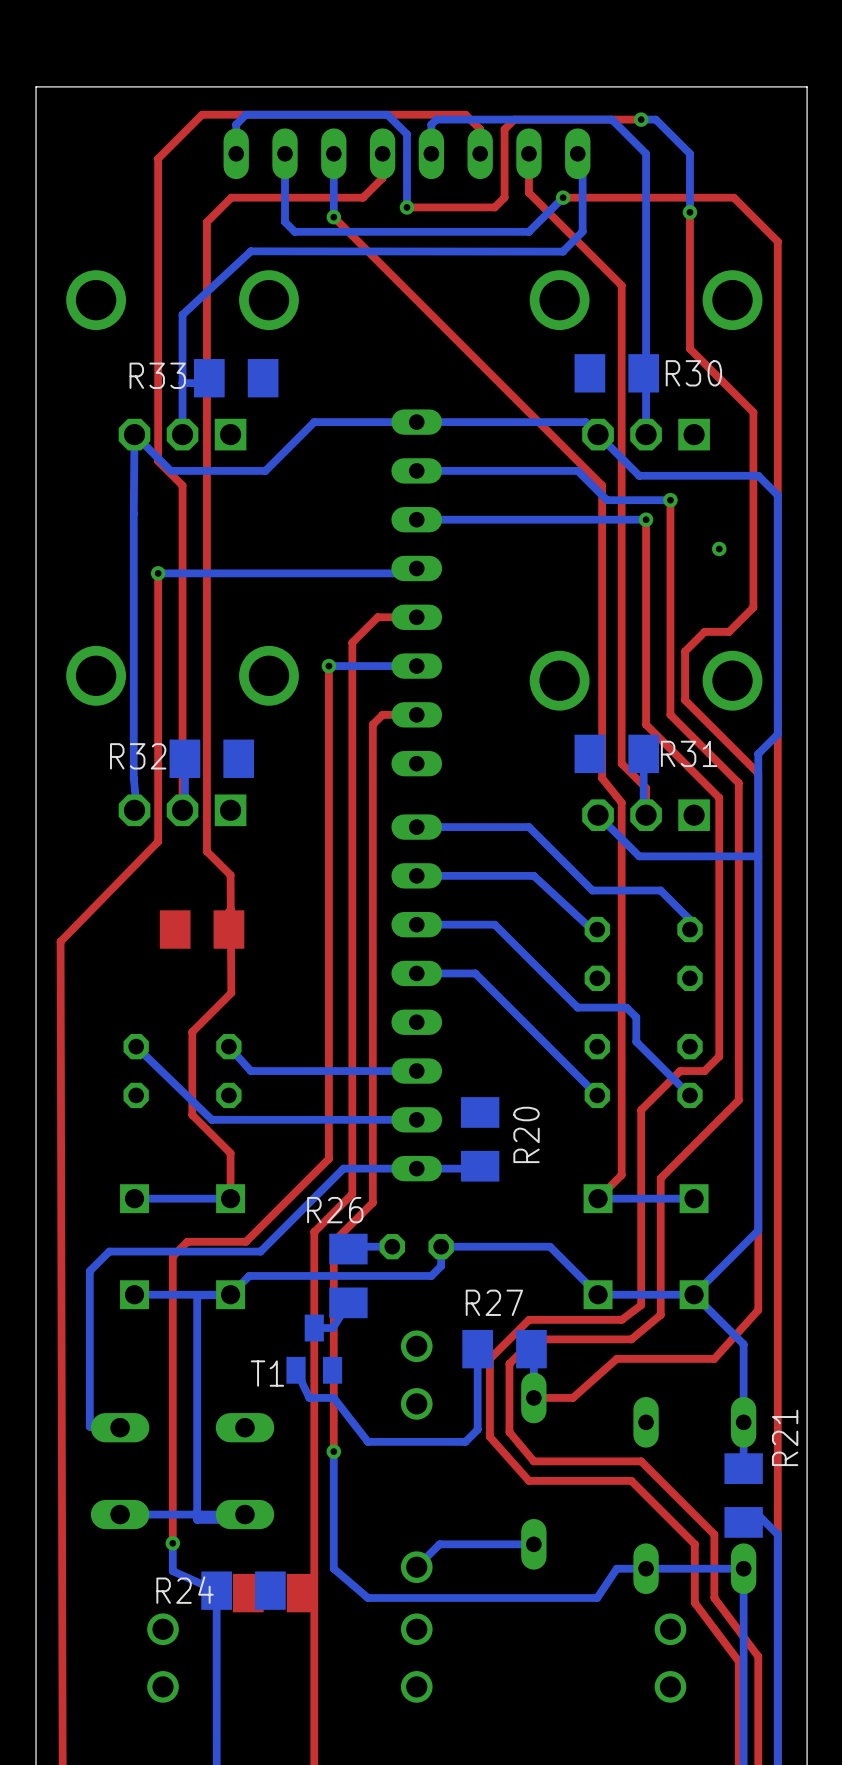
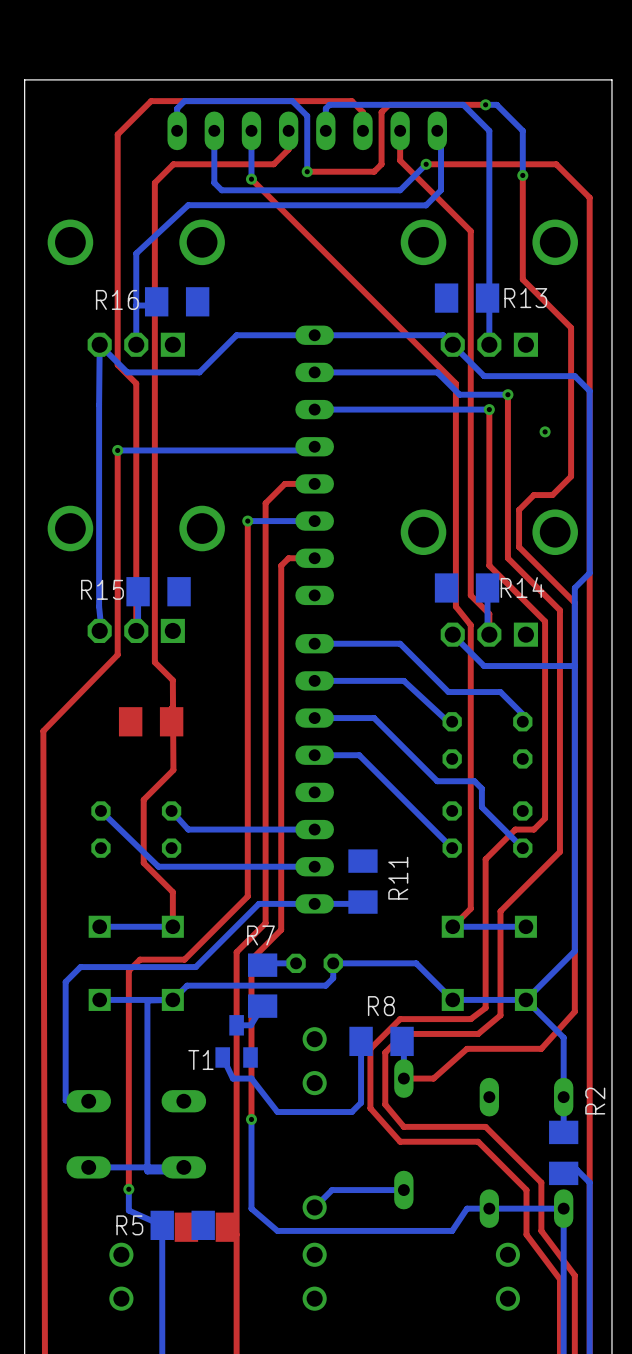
R30 name: R30 (693, 373) -> R13 (525, 298)
R33 name: R33 (157, 375) -> R16 (117, 299)
R31 name: R31 (689, 753) -> R14 (522, 587)
R32 name: R32 (138, 756) -> R15 (102, 589)
R20 name: R20 (526, 1134) -> R11 (398, 878)
R26 name: R26 (335, 1210) -> R7 (260, 935)
R27 name: R27 (494, 1302) -> R8 (381, 1006)
R21 name: R21 (785, 1437) -> R2 (595, 1101)
R24 name: R24 (185, 1590) -> R5 (129, 1225)

